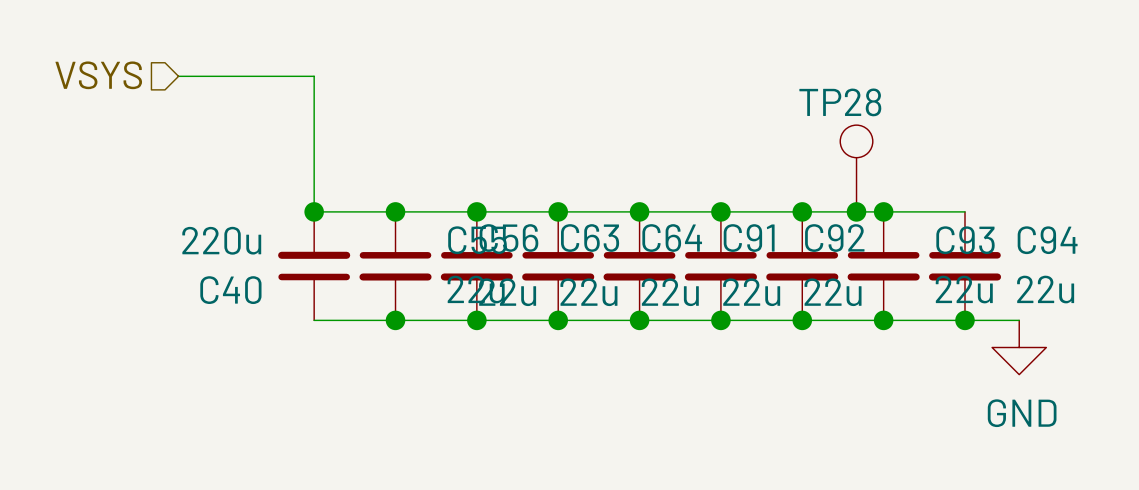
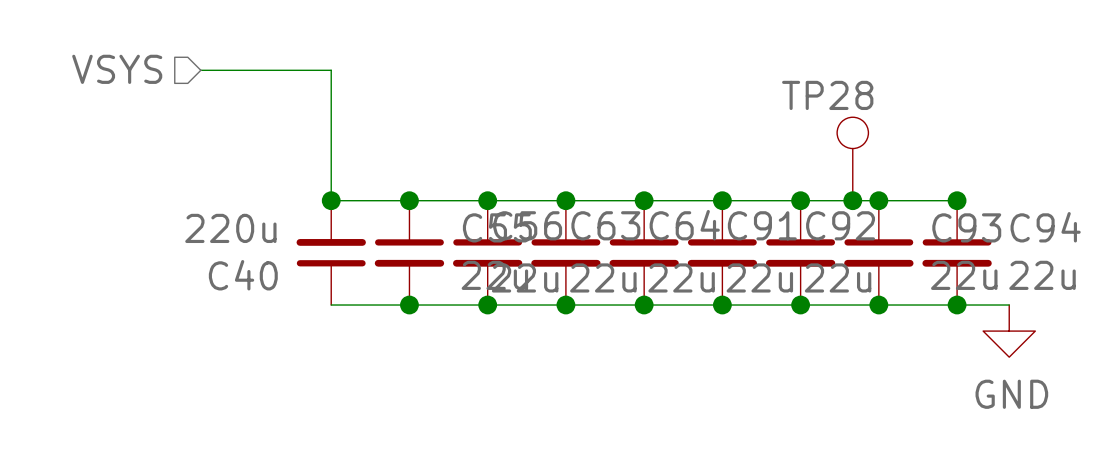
junction: none -> (957, 200)

